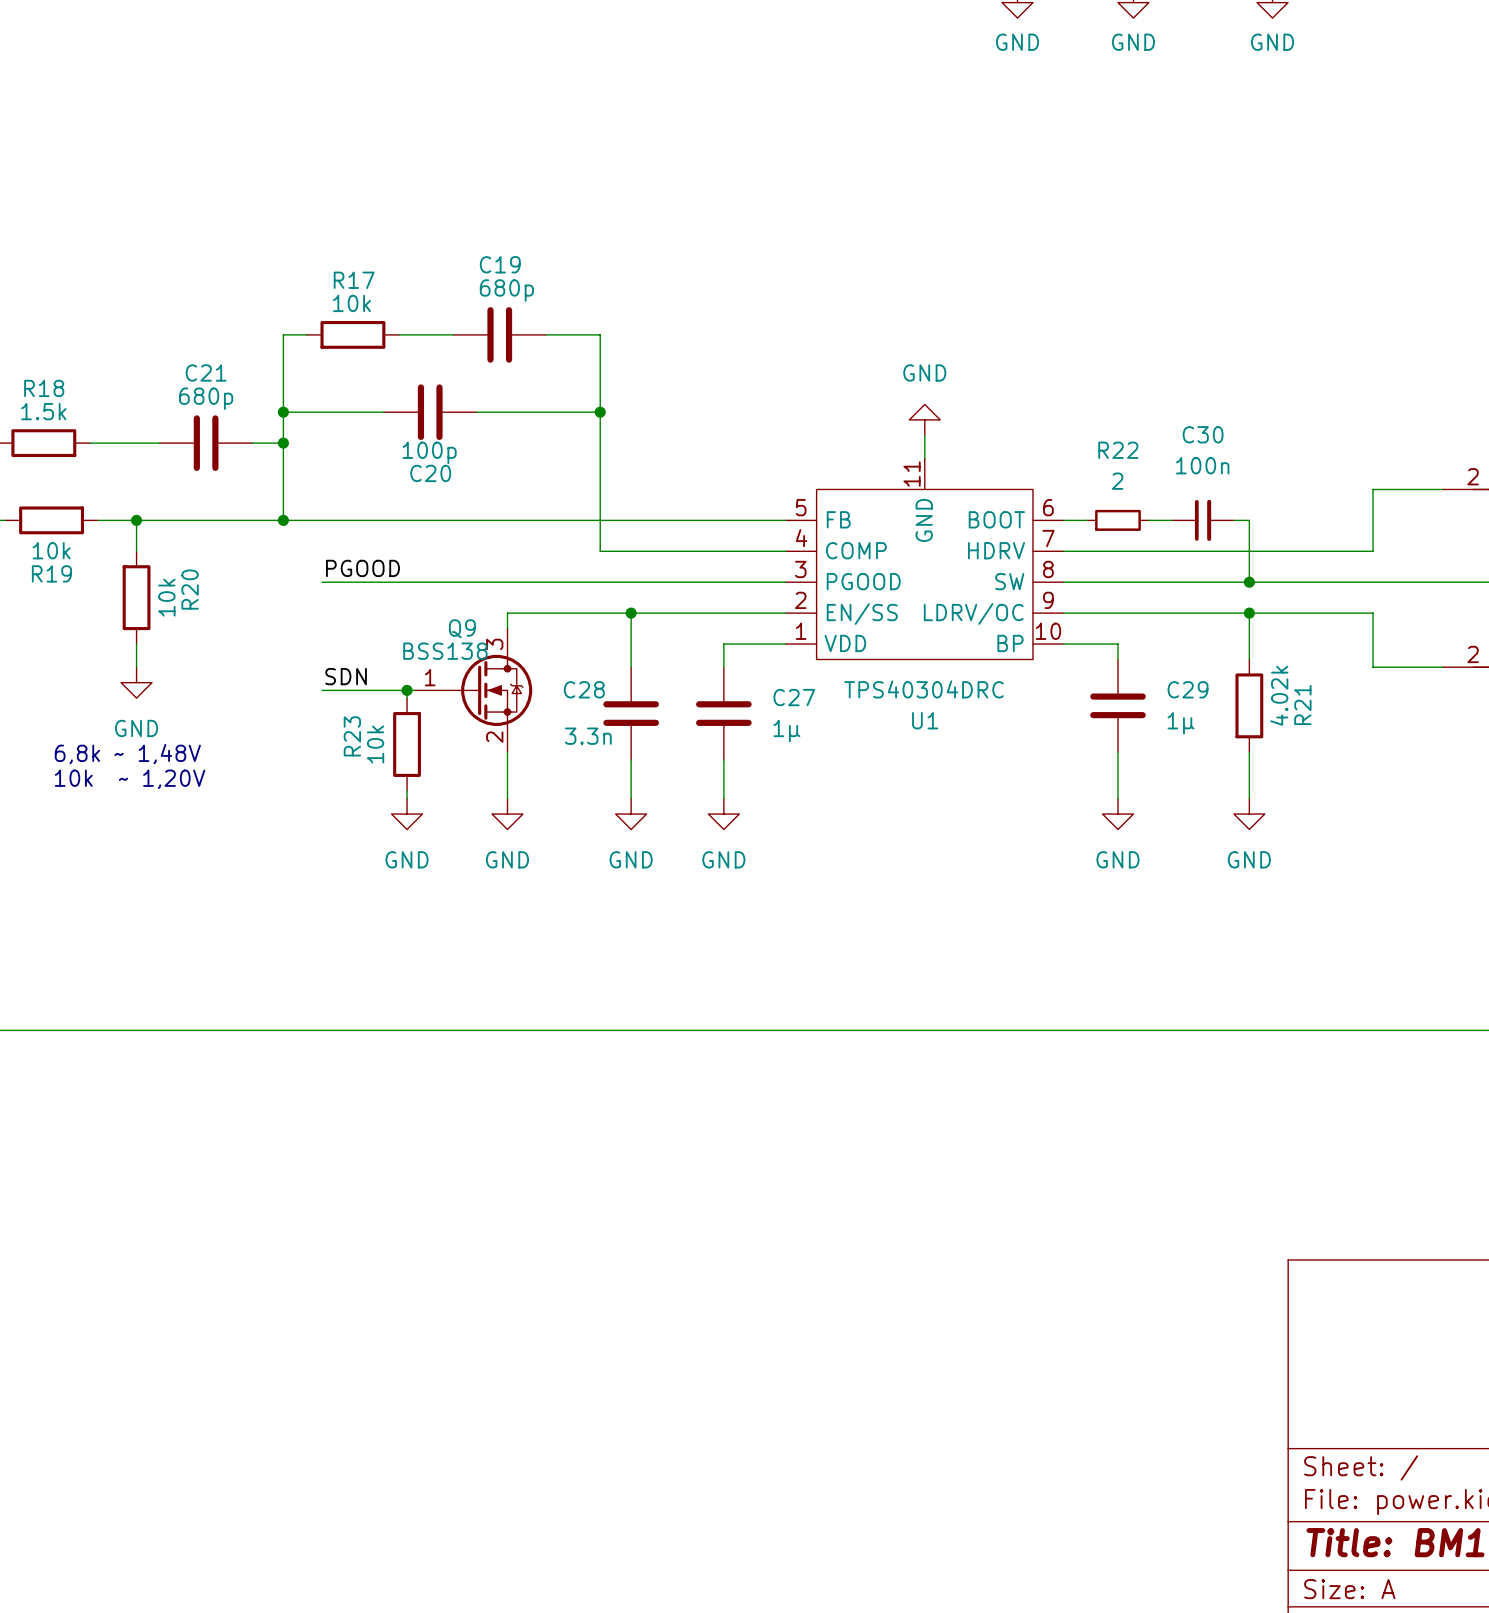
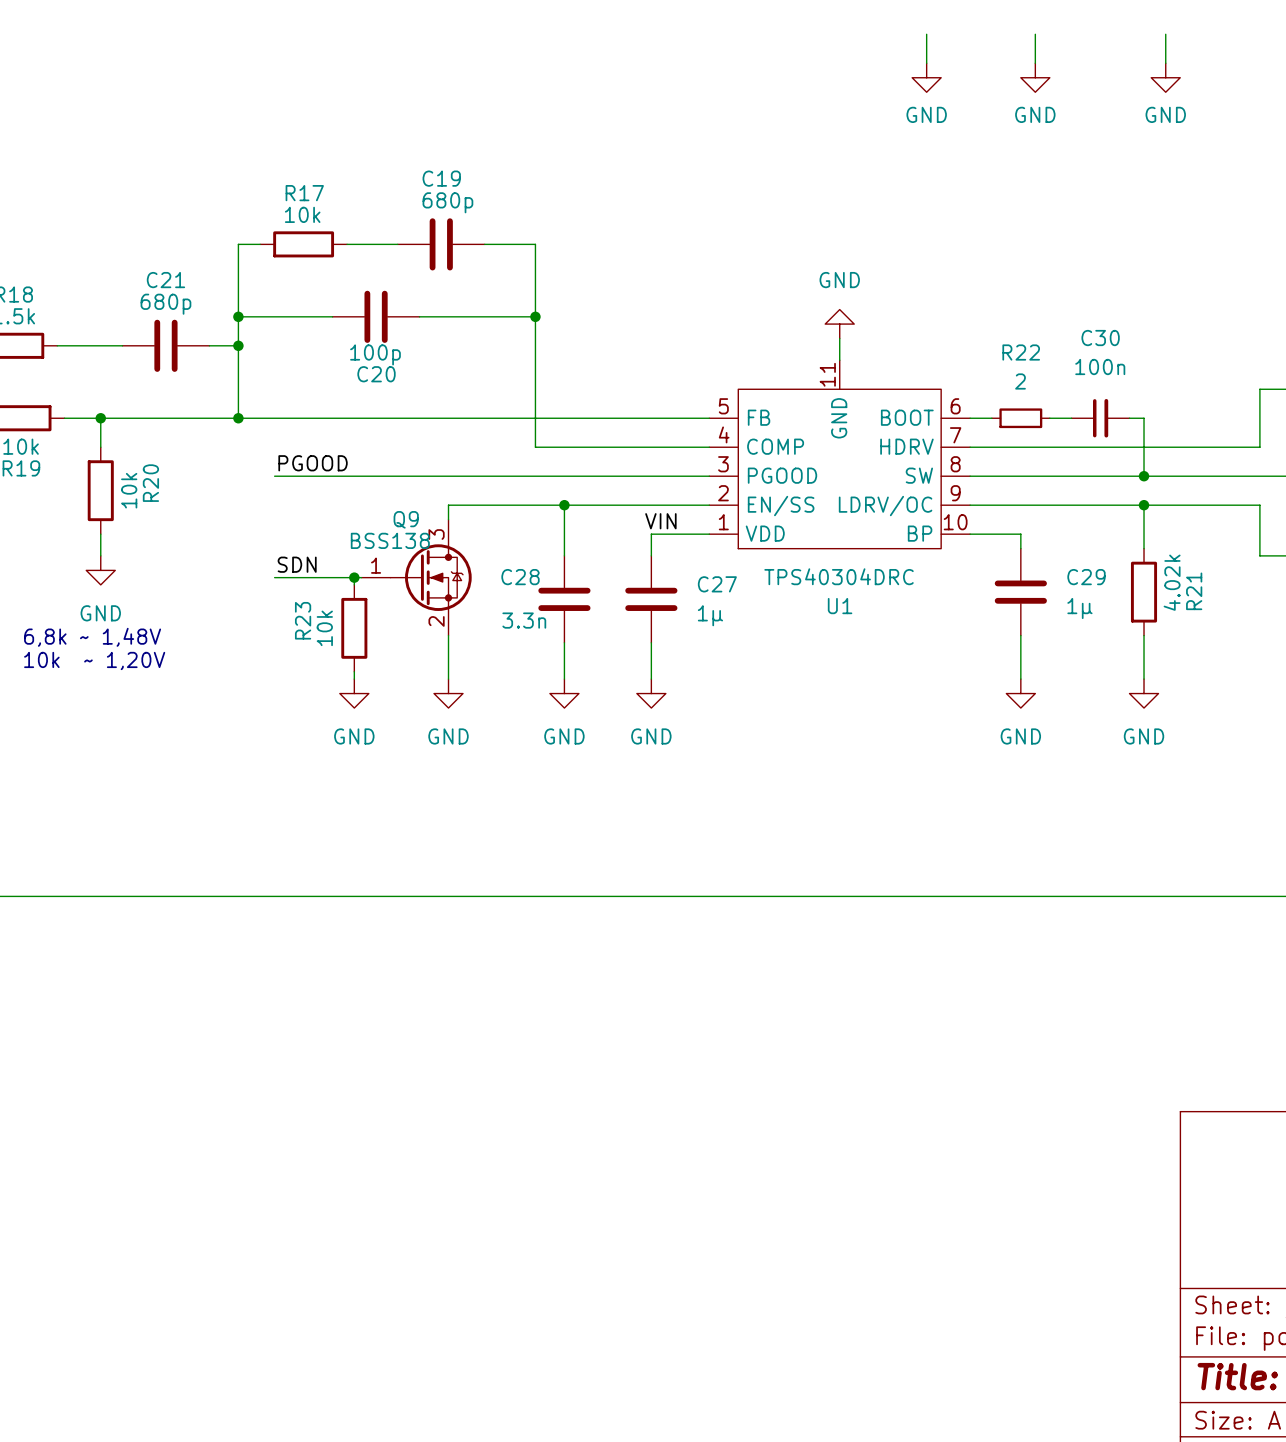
wire: none -> (926, 34) (926, 63)
wire: none -> (1035, 34) (1035, 63)
wire: none -> (1165, 34) (1165, 63)
power symbol: none -> GND (926, 77)
power symbol: none -> GND (1035, 77)
power symbol: none -> GND (1165, 77)
label: none -> VIN (660, 521)

